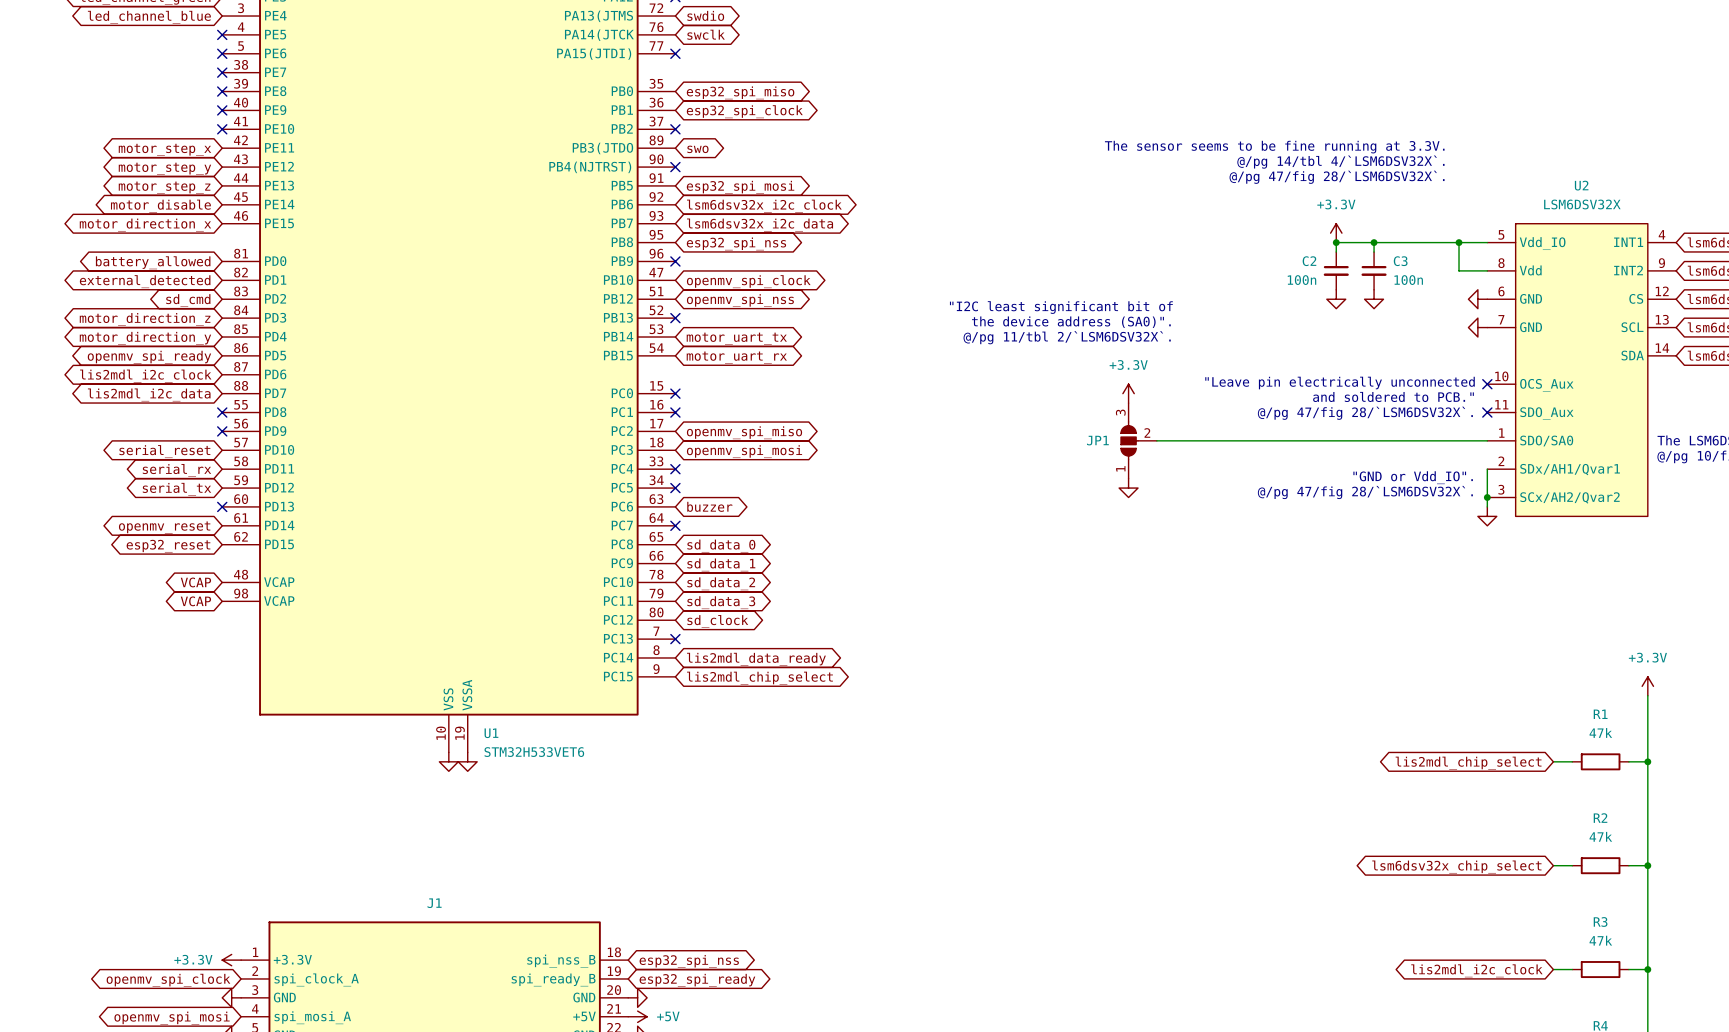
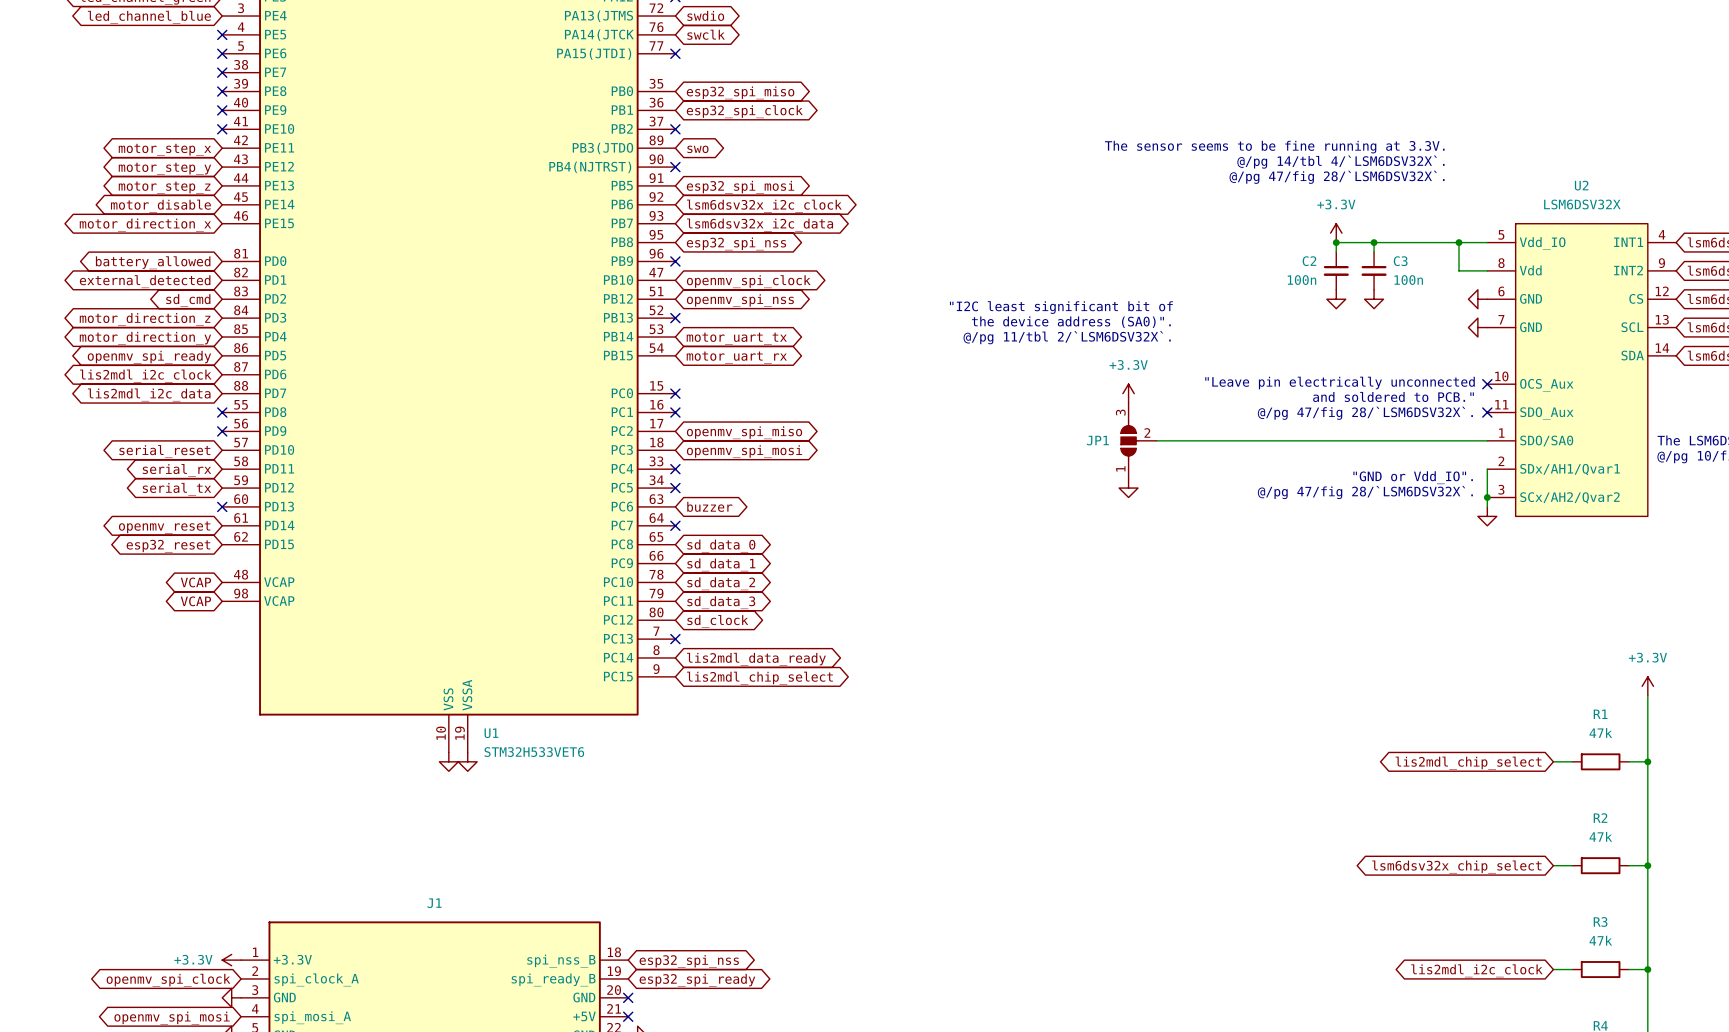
no-connect mark: none -> (628, 997)
power symbol: (637, 997) -> none
no-connect mark: none -> (628, 1016)
power symbol: +5V (637, 1016) -> none

